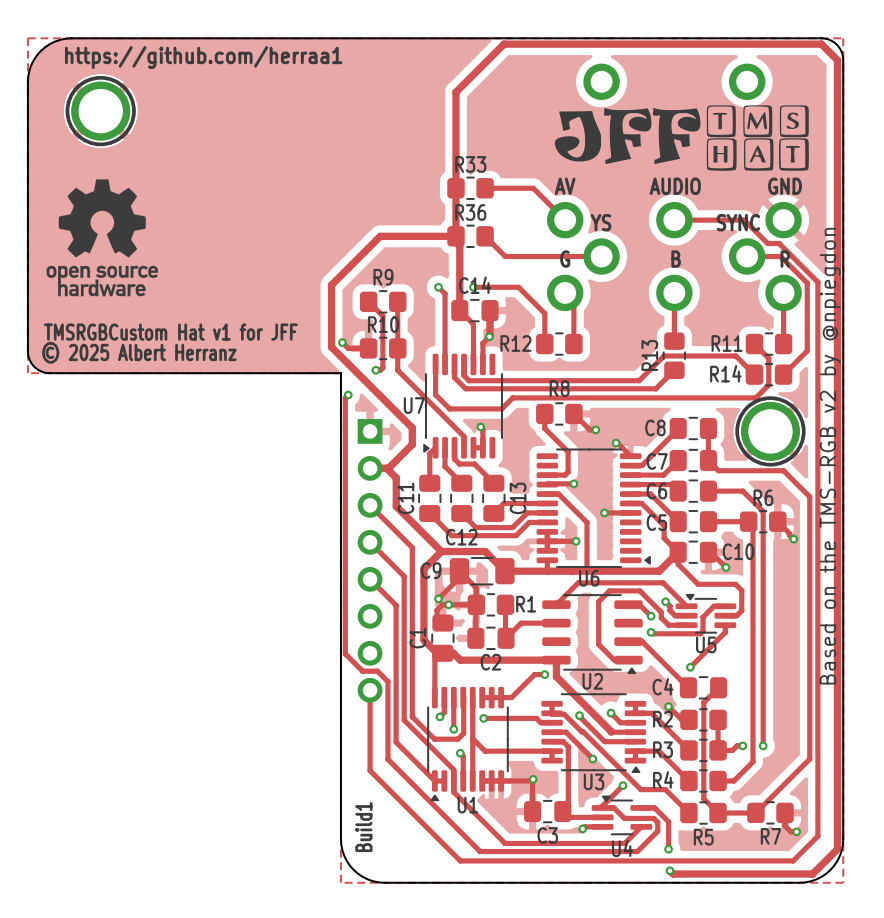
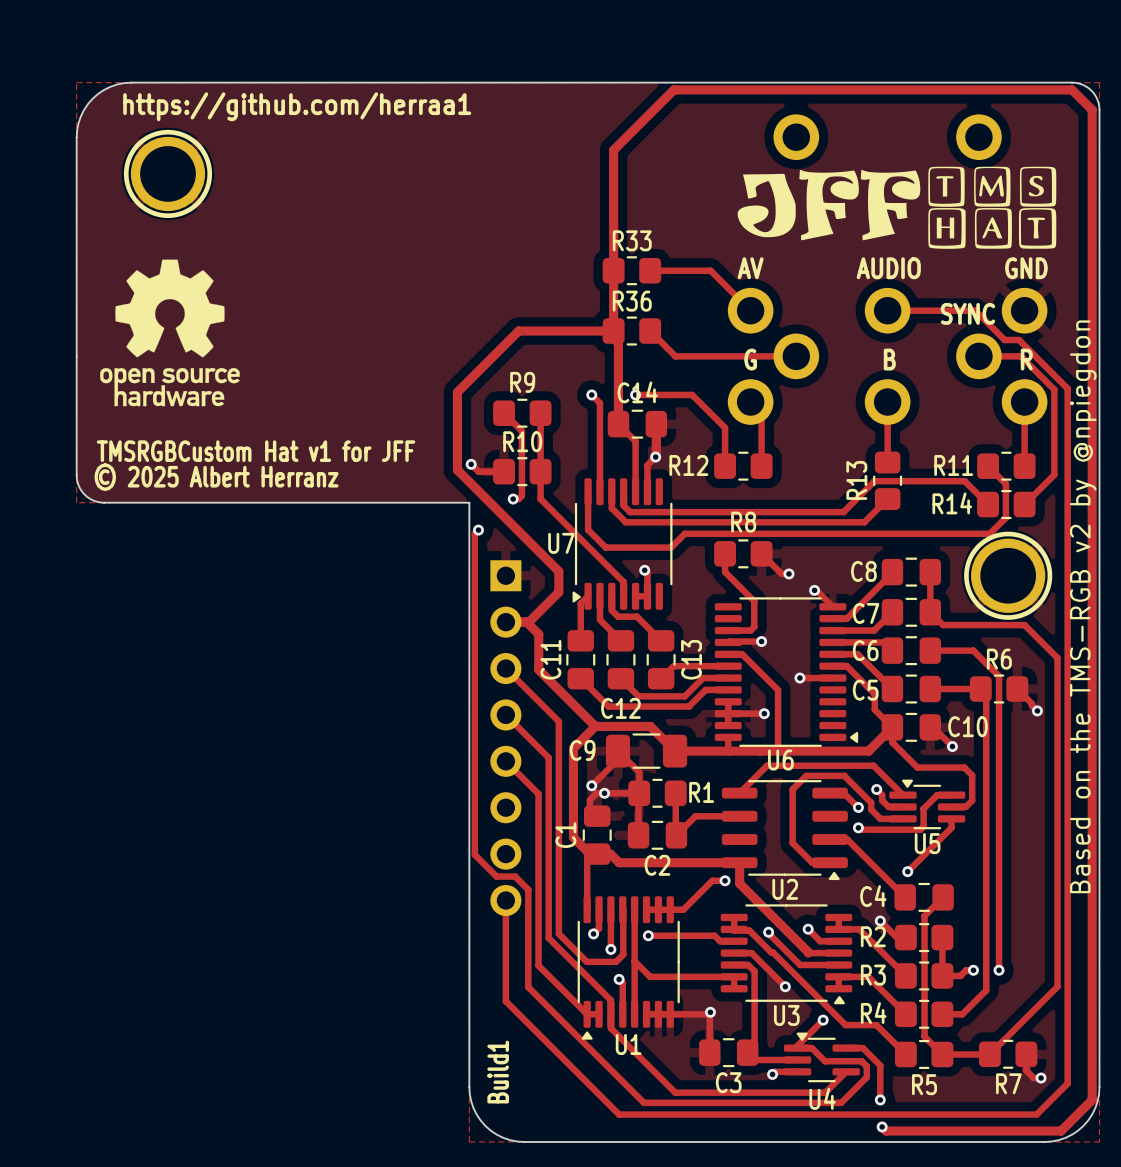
text: YS (601, 222) -> none

